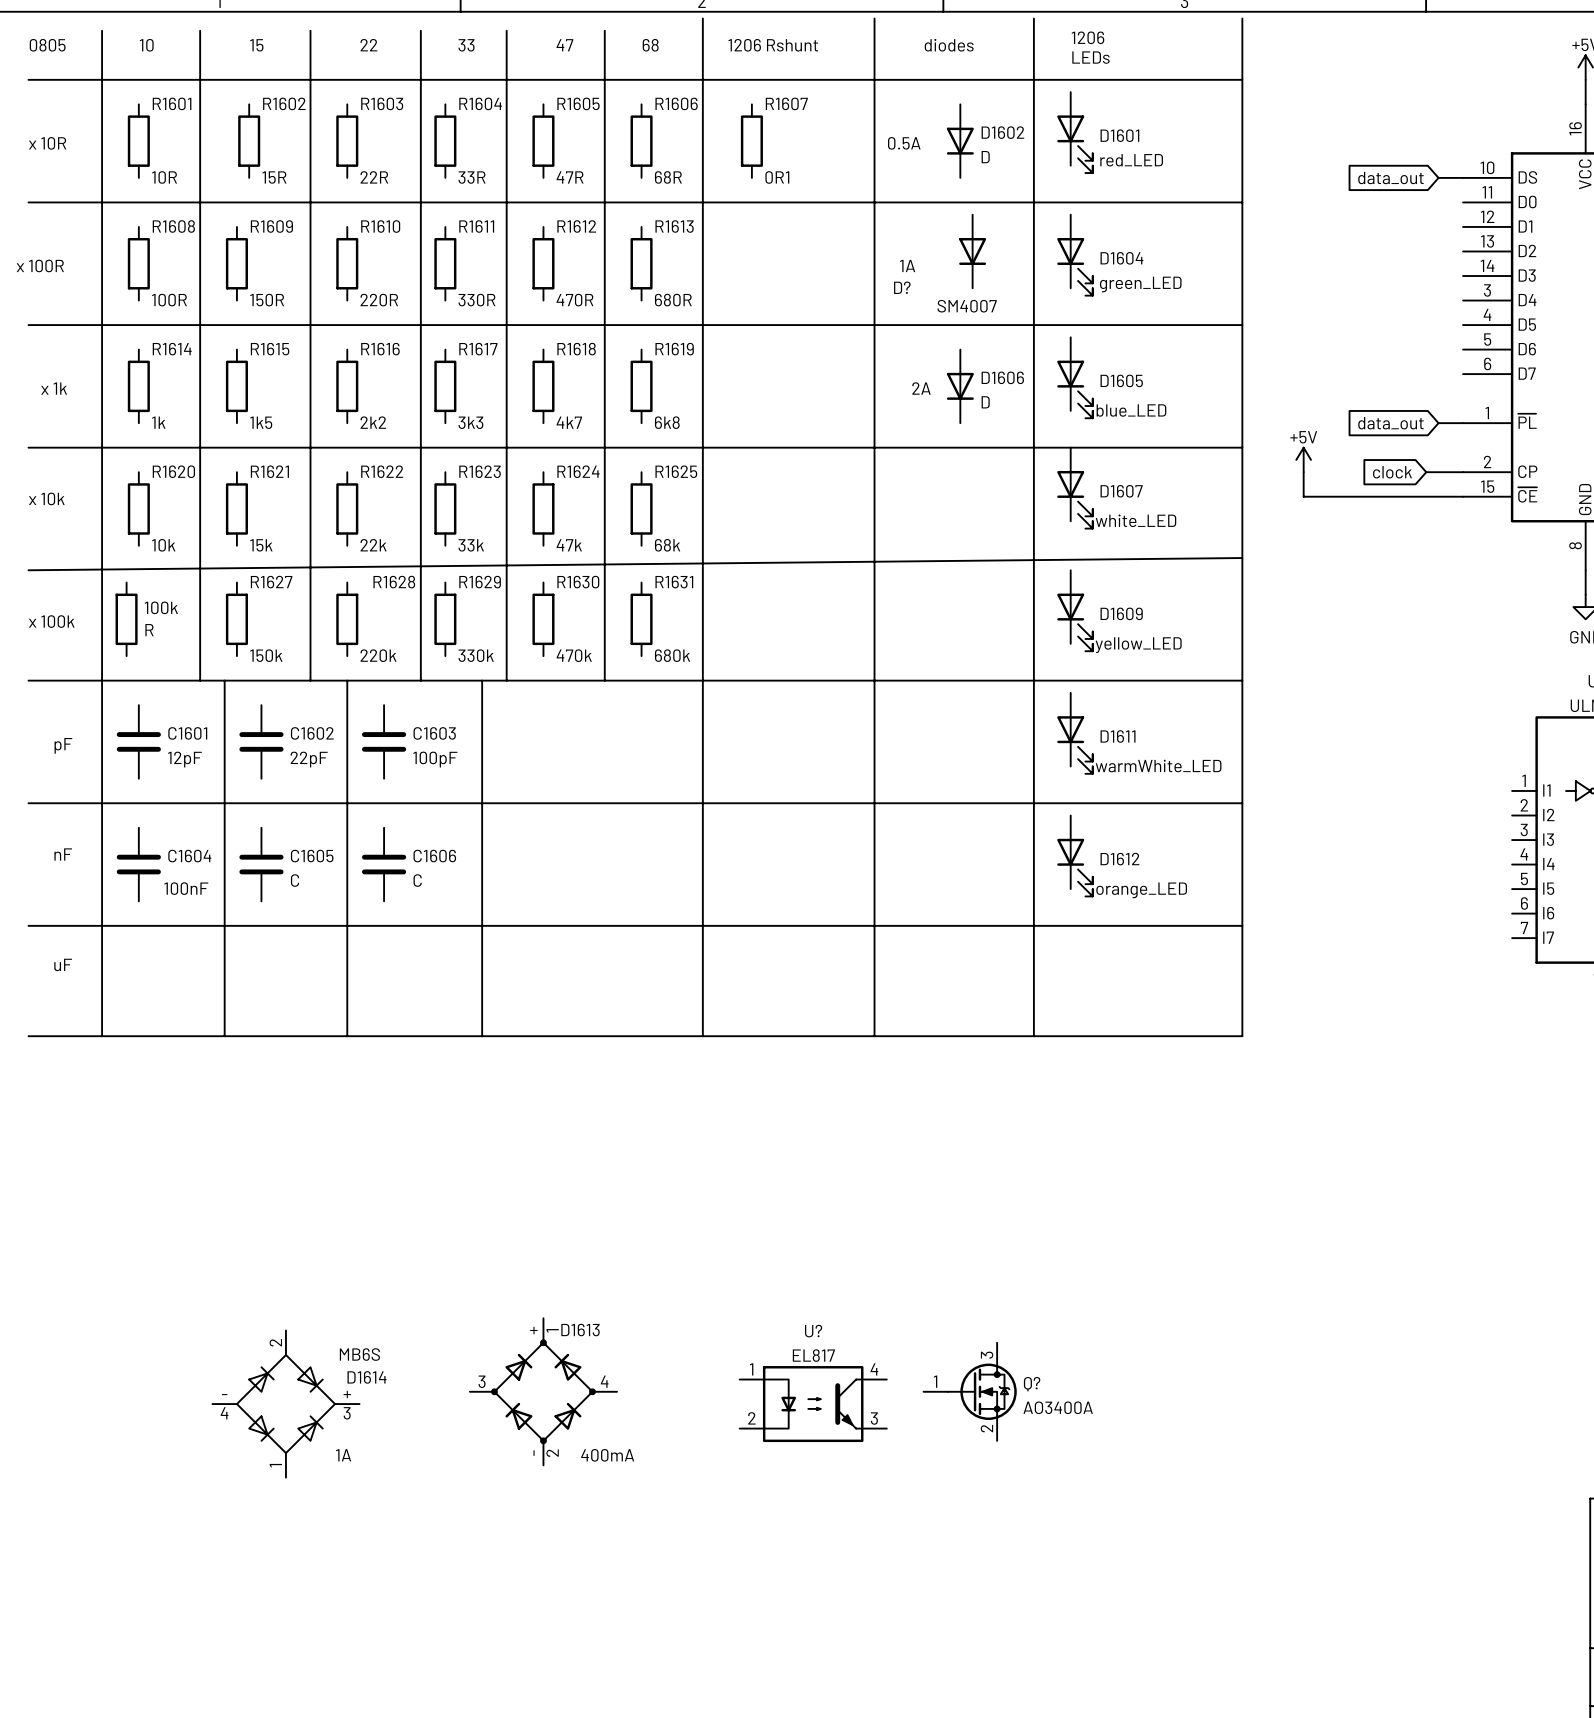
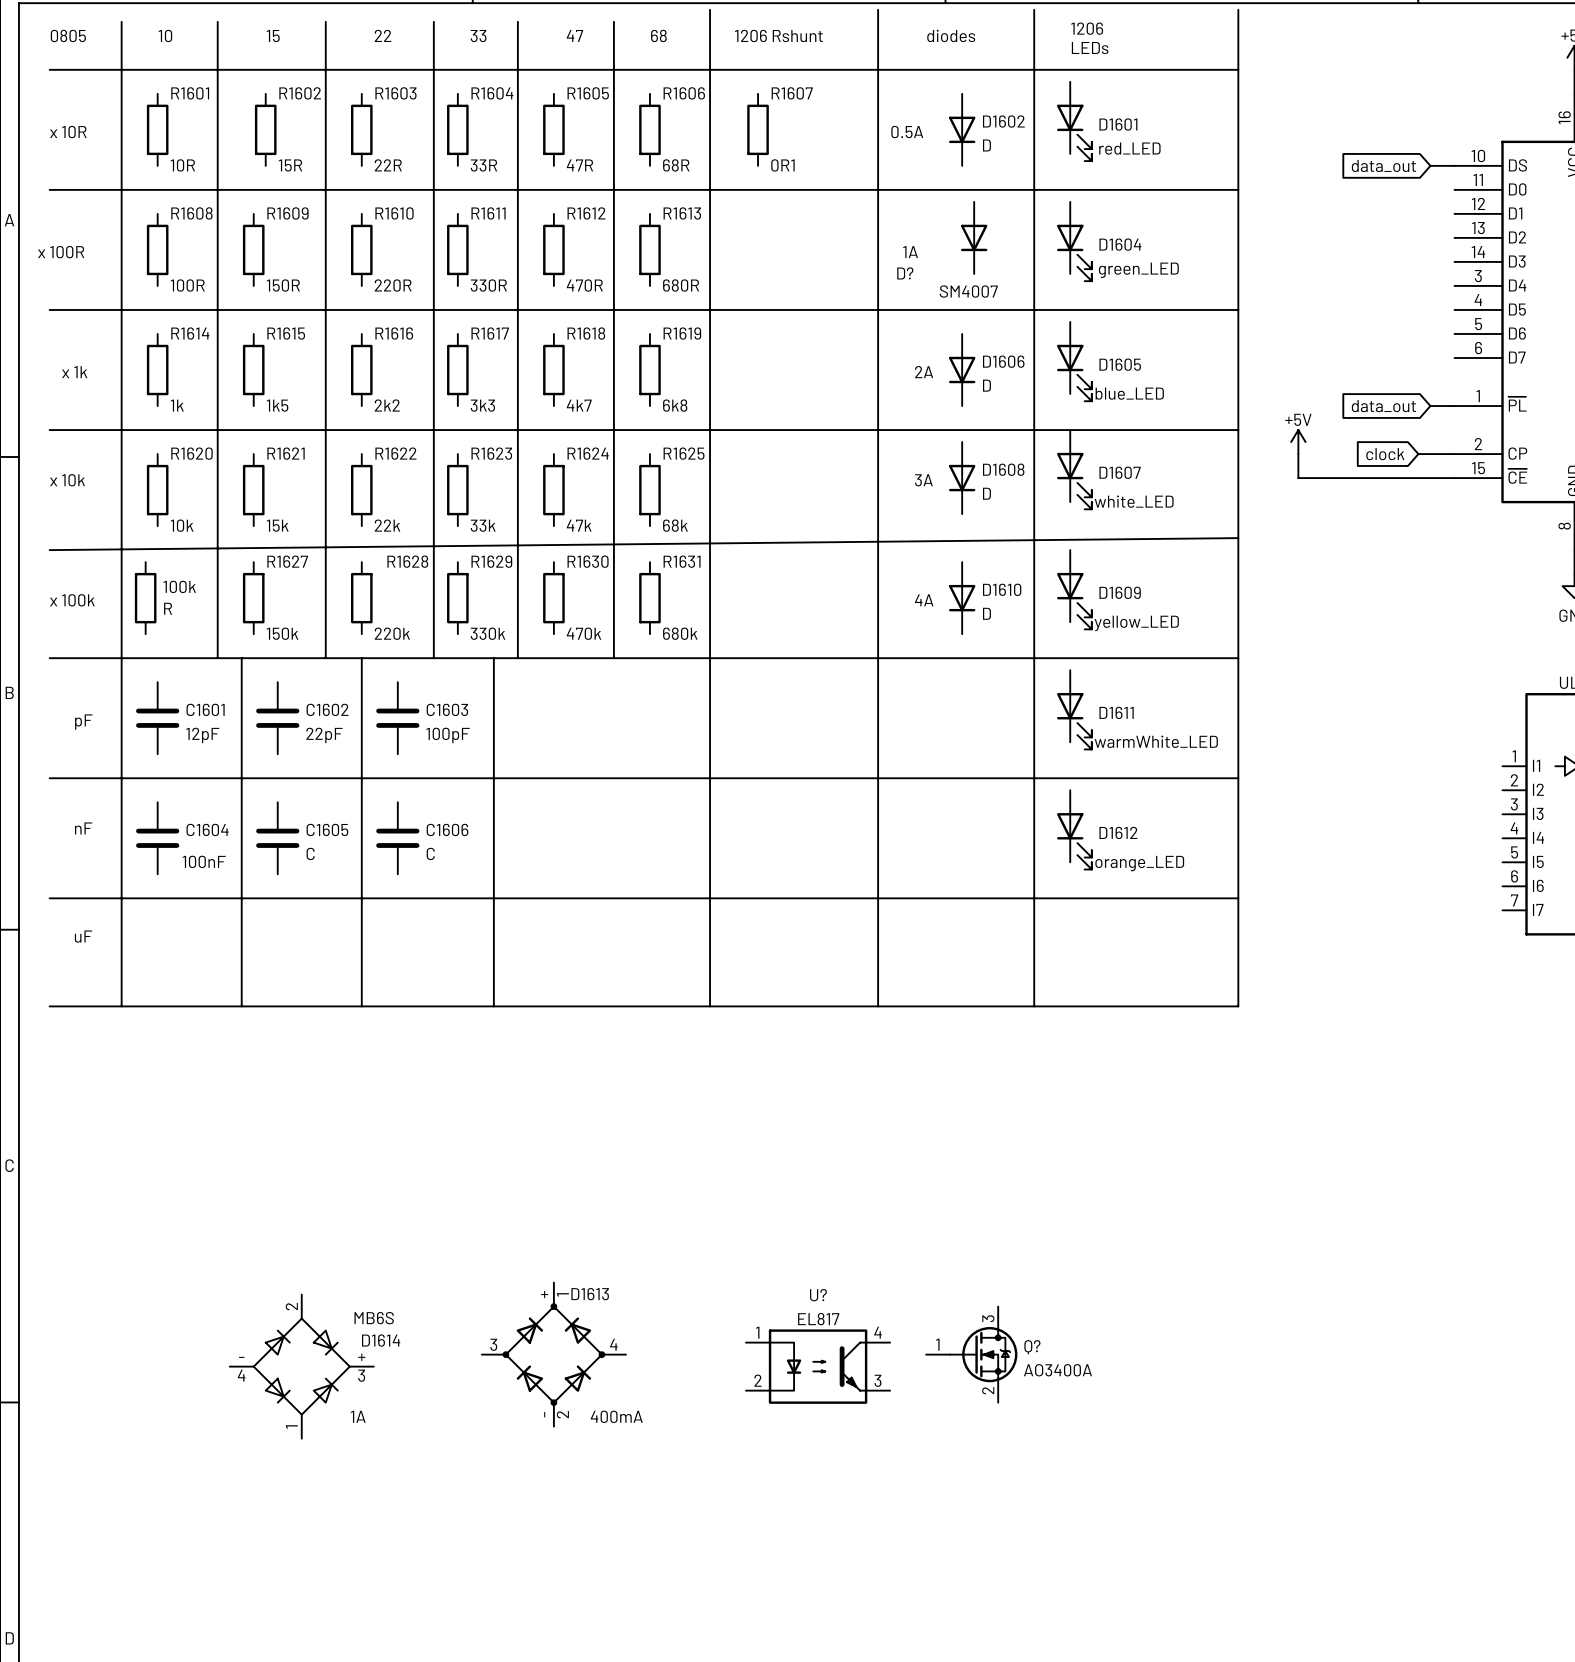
D1608: none -> D (962, 478)
text: none -> 3A (923, 480)
D1610: none -> D (962, 598)
text: none -> 4A (924, 600)

